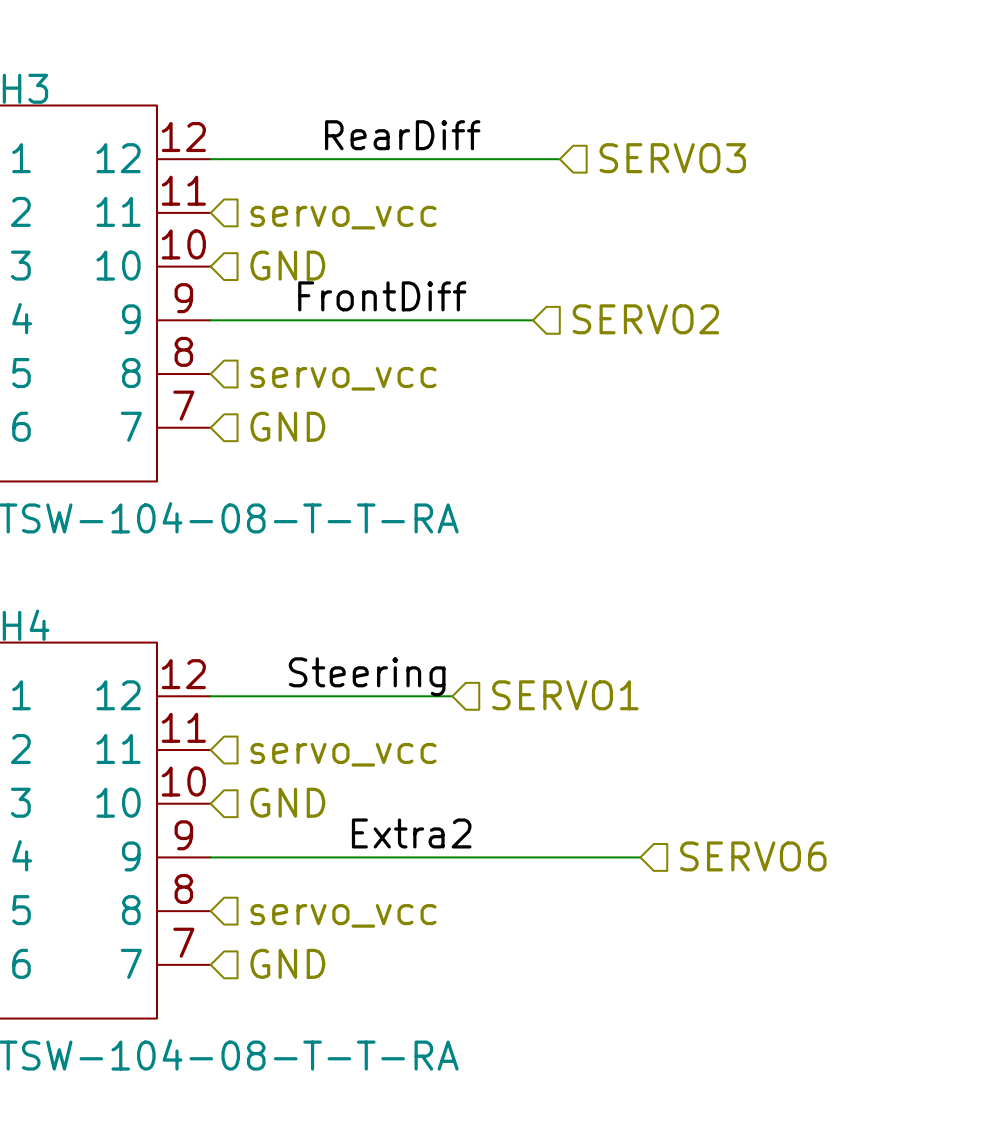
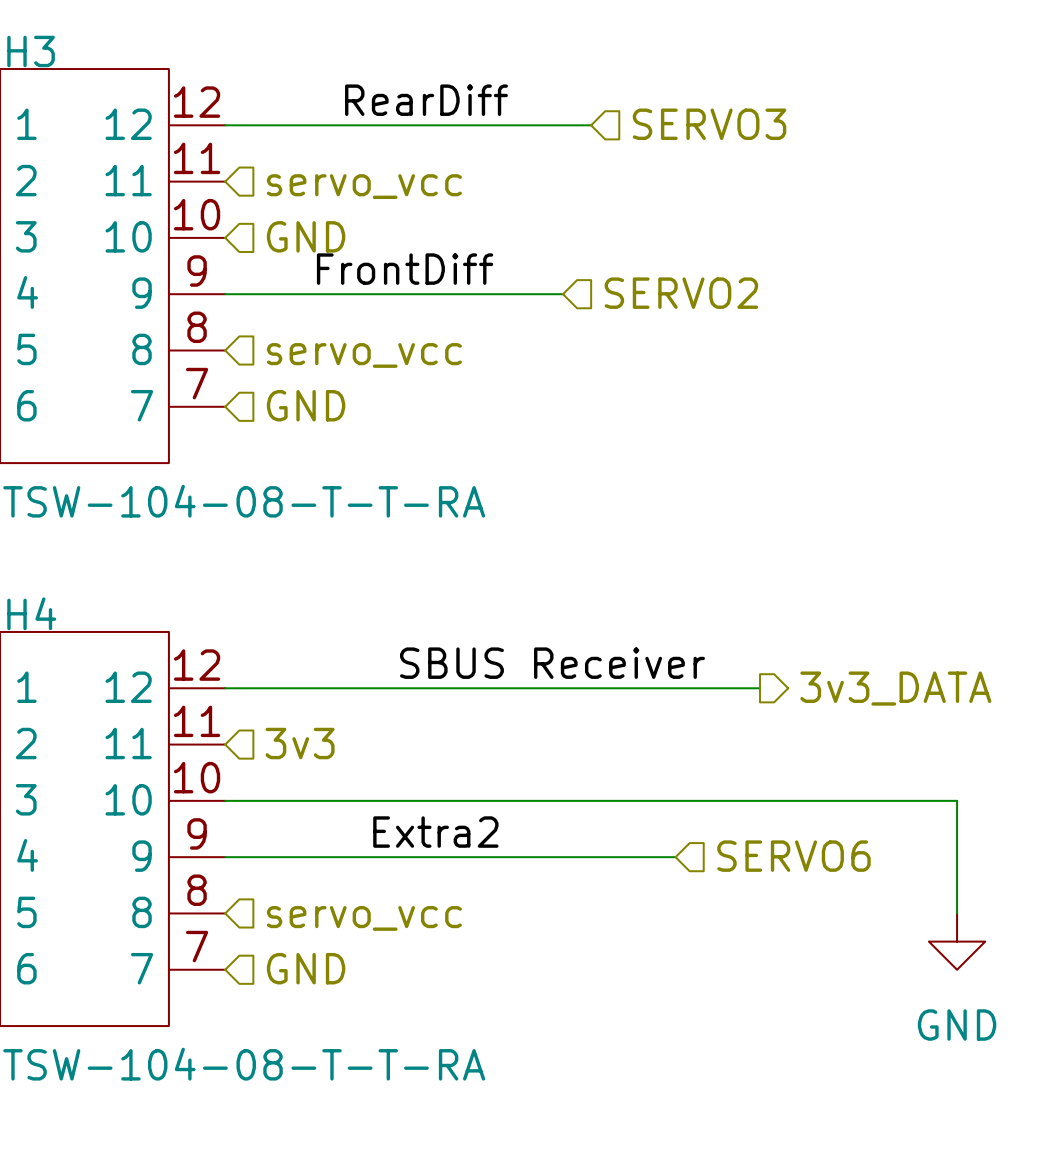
label: none -> SBUS Receiver (552, 663)
label: Steering (367, 676) -> none
hierarchical label: SERVO1 (565, 695) -> none
wire: none -> (478, 688) (760, 688)
hierarchical label: none -> 3v3_DATA (895, 688)
hierarchical label: servo_vcc (343, 754) -> 3v3 (300, 743)
hierarchical label: GND (287, 802) -> none
wire: none -> (225, 800) (957, 800) (957, 913)
power symbol: none -> GND (957, 941)

